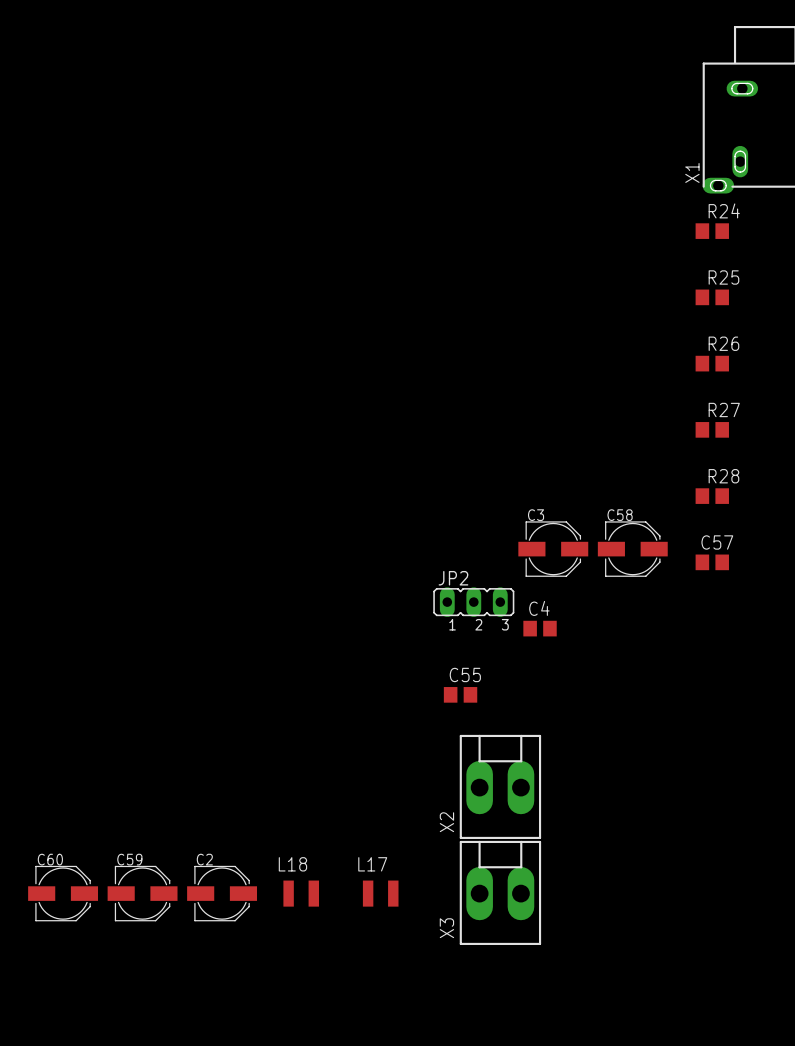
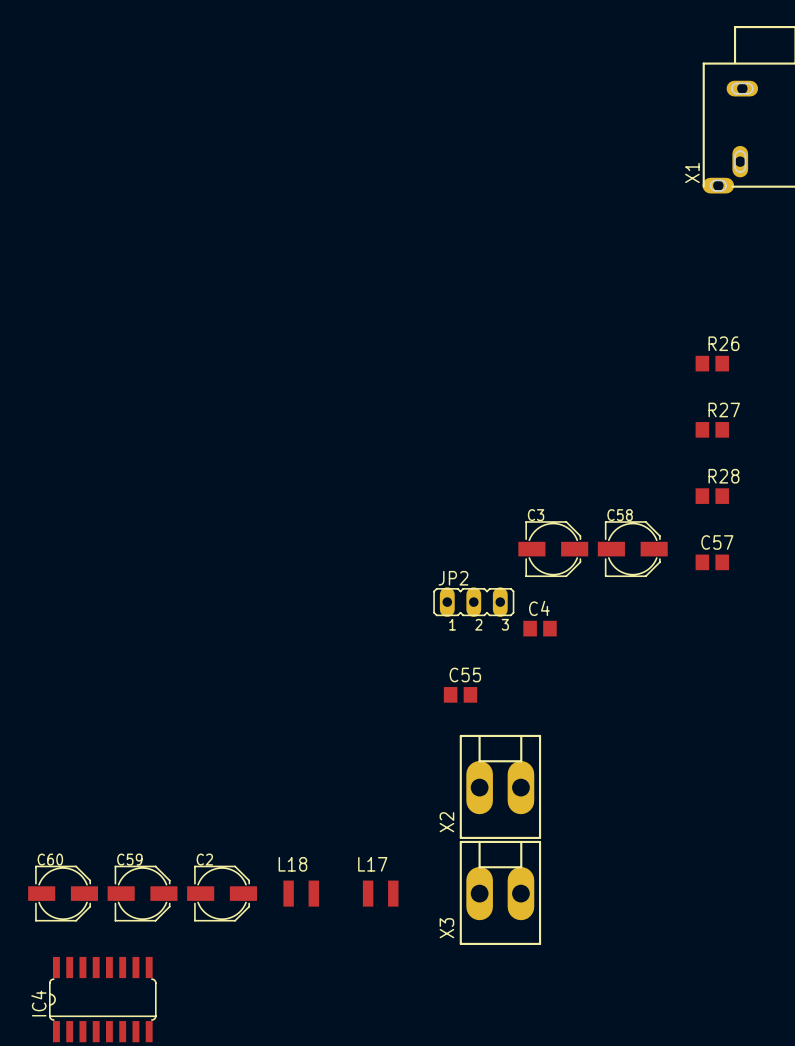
R24: (712, 231) -> none
R25: (712, 297) -> none
IC4: none -> (102, 999)

